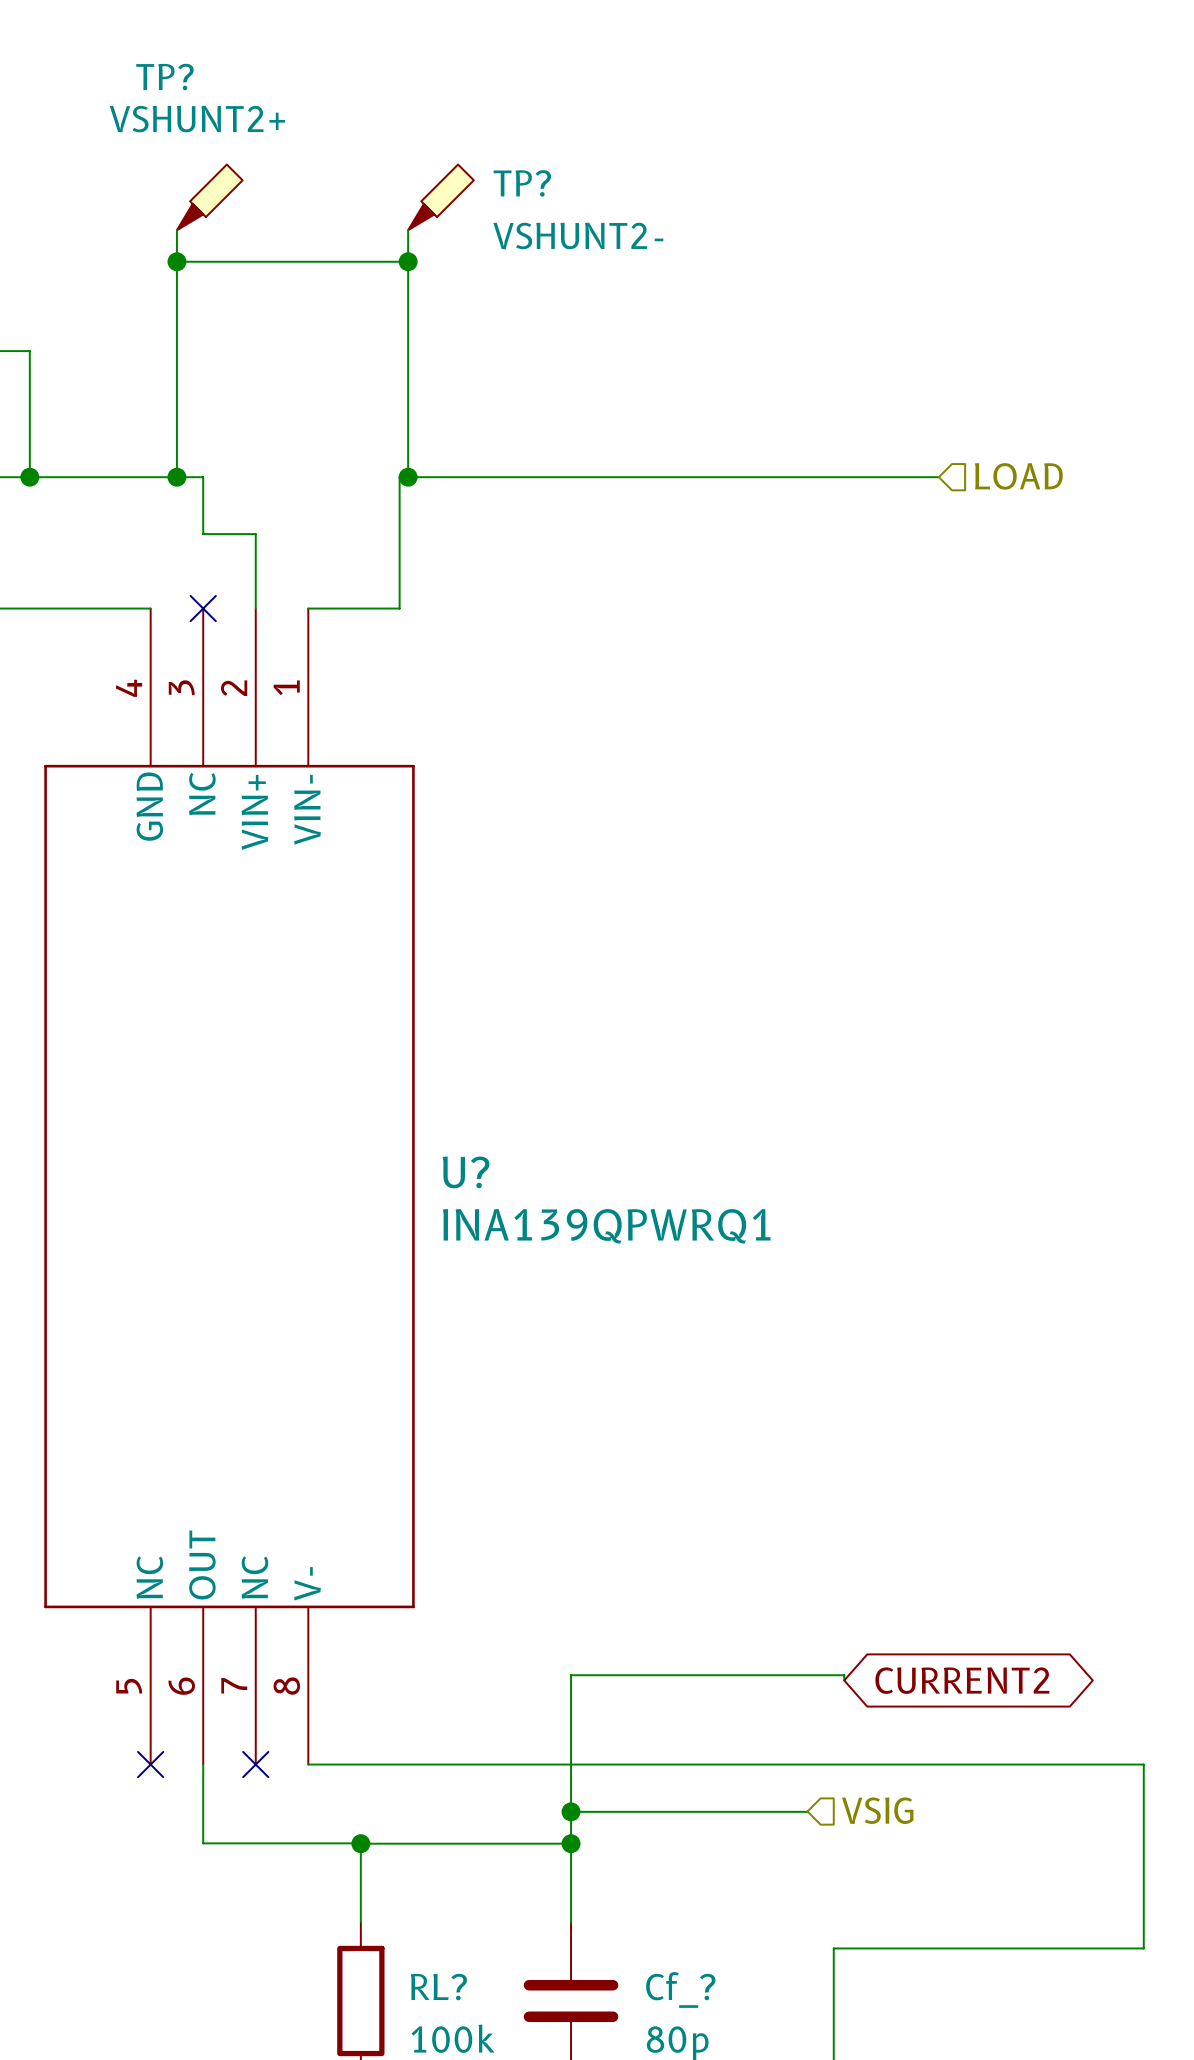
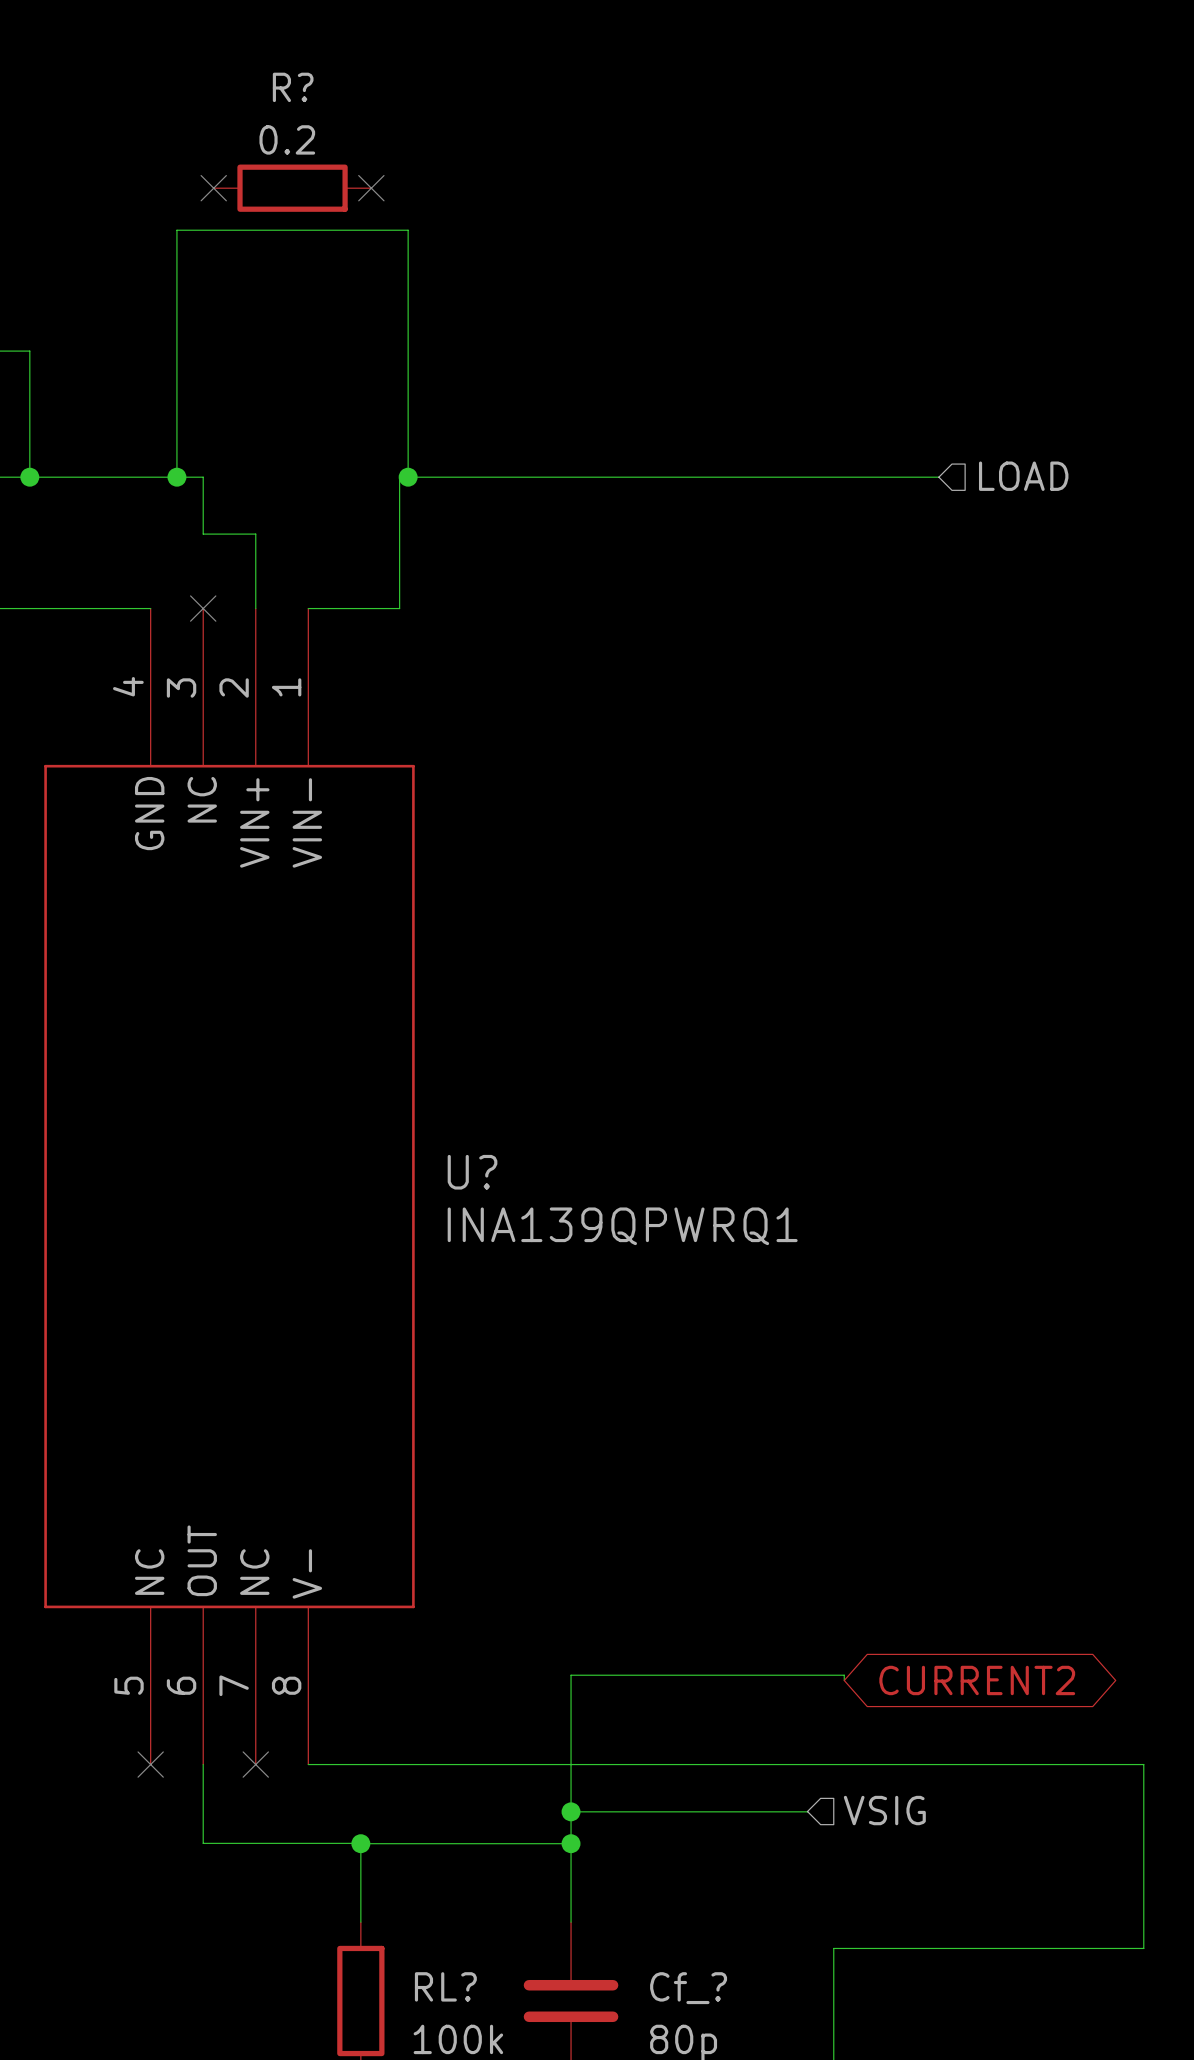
no-connect mark: none -> (213, 188)
R?: none -> 0.2 (292, 188)
no-connect mark: none -> (371, 188)
TP?: VSHUNT2+ (209, 197) -> none
TP?: VSHUNT2- (440, 197) -> none
wire: (176, 261) (408, 261) -> (176, 230) (408, 230)
junction: (176, 261) -> none
junction: (408, 261) -> none

